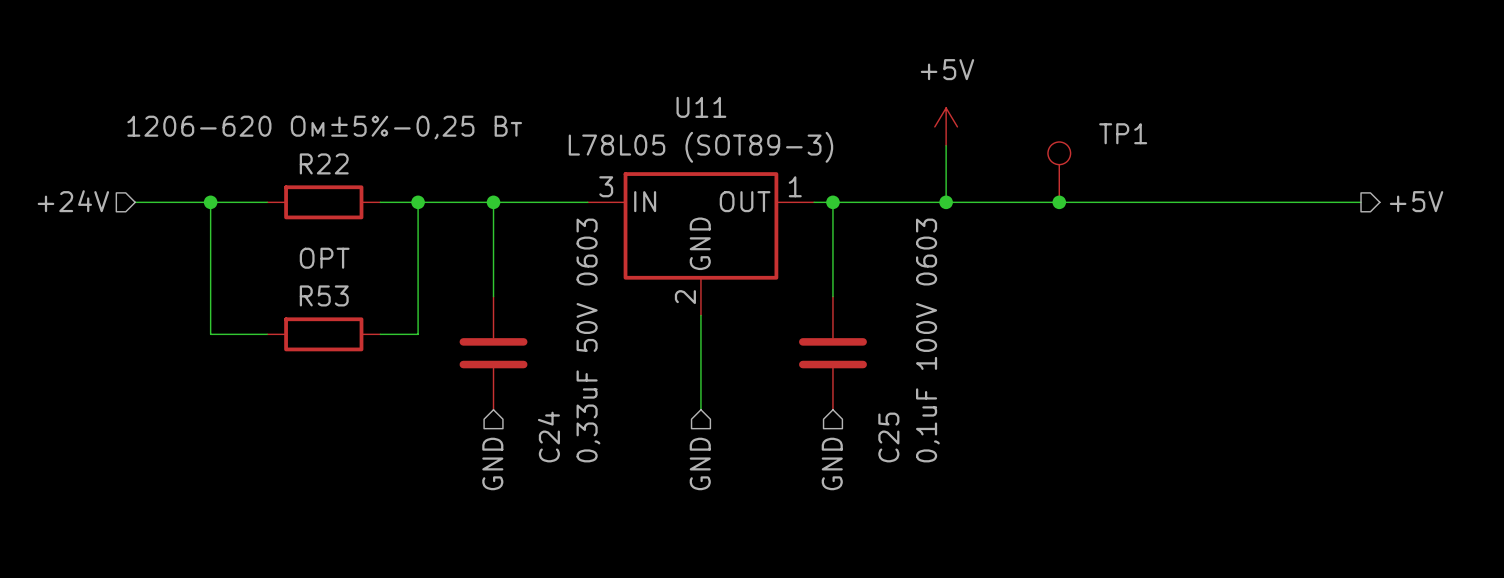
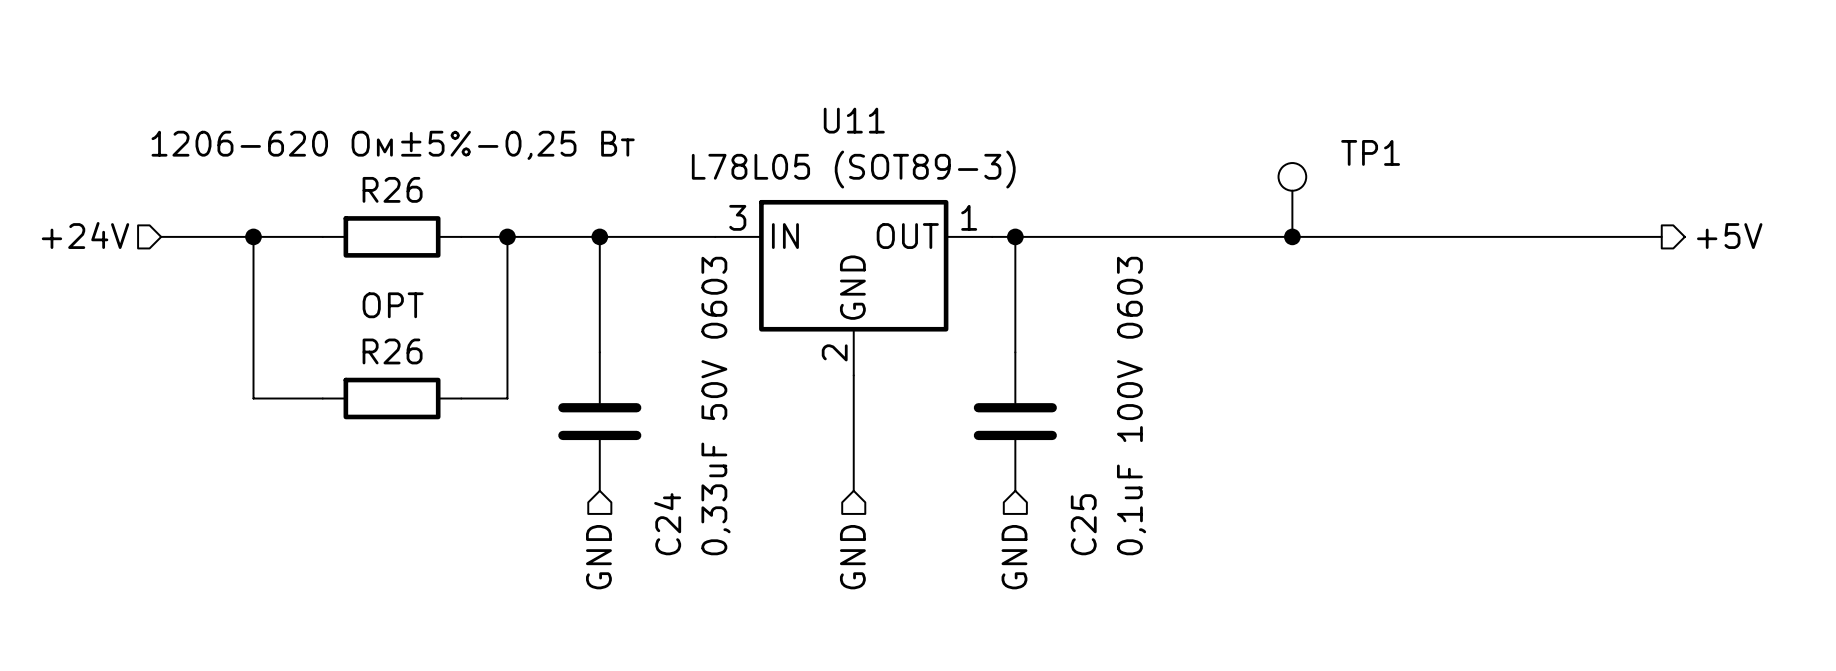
power symbol: +5V (946, 126) -> none
wire: (946, 145) (946, 202) -> none
R22 name: R22 (324, 163) -> R26 (392, 189)
junction: (946, 202) -> none
R53 name: R53 (324, 295) -> R26 (392, 351)

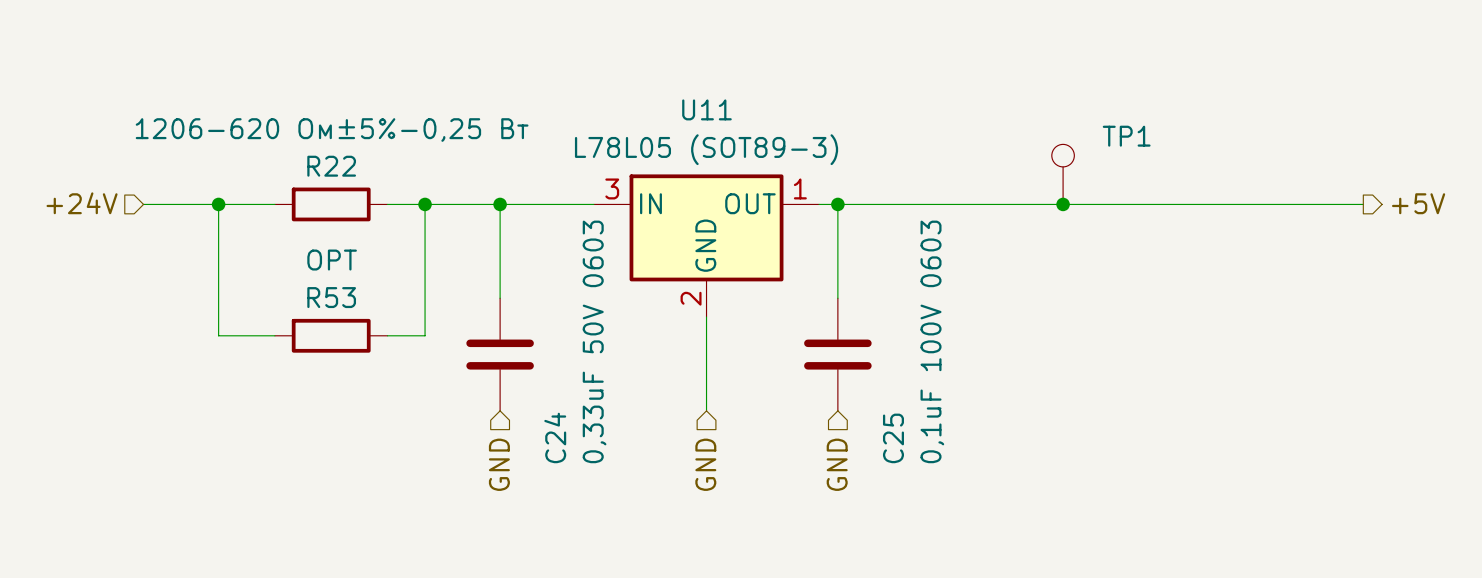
R26 name: R26 (392, 189) -> R22 (331, 166)
R26 name: R26 (392, 351) -> R53 (331, 297)

